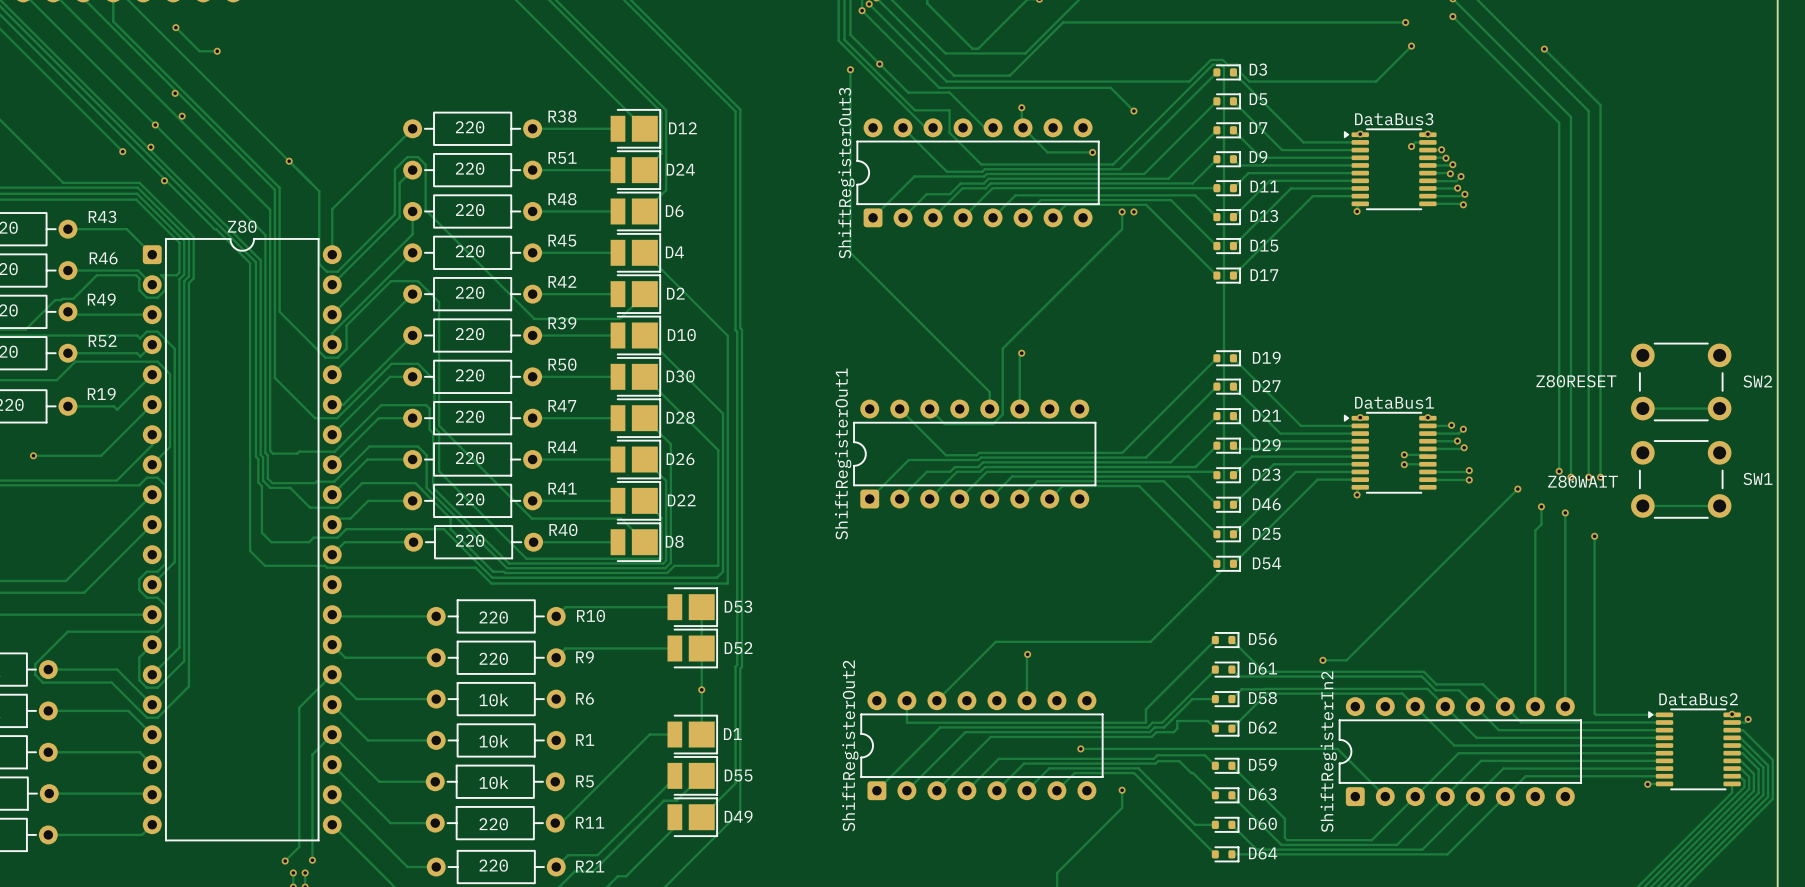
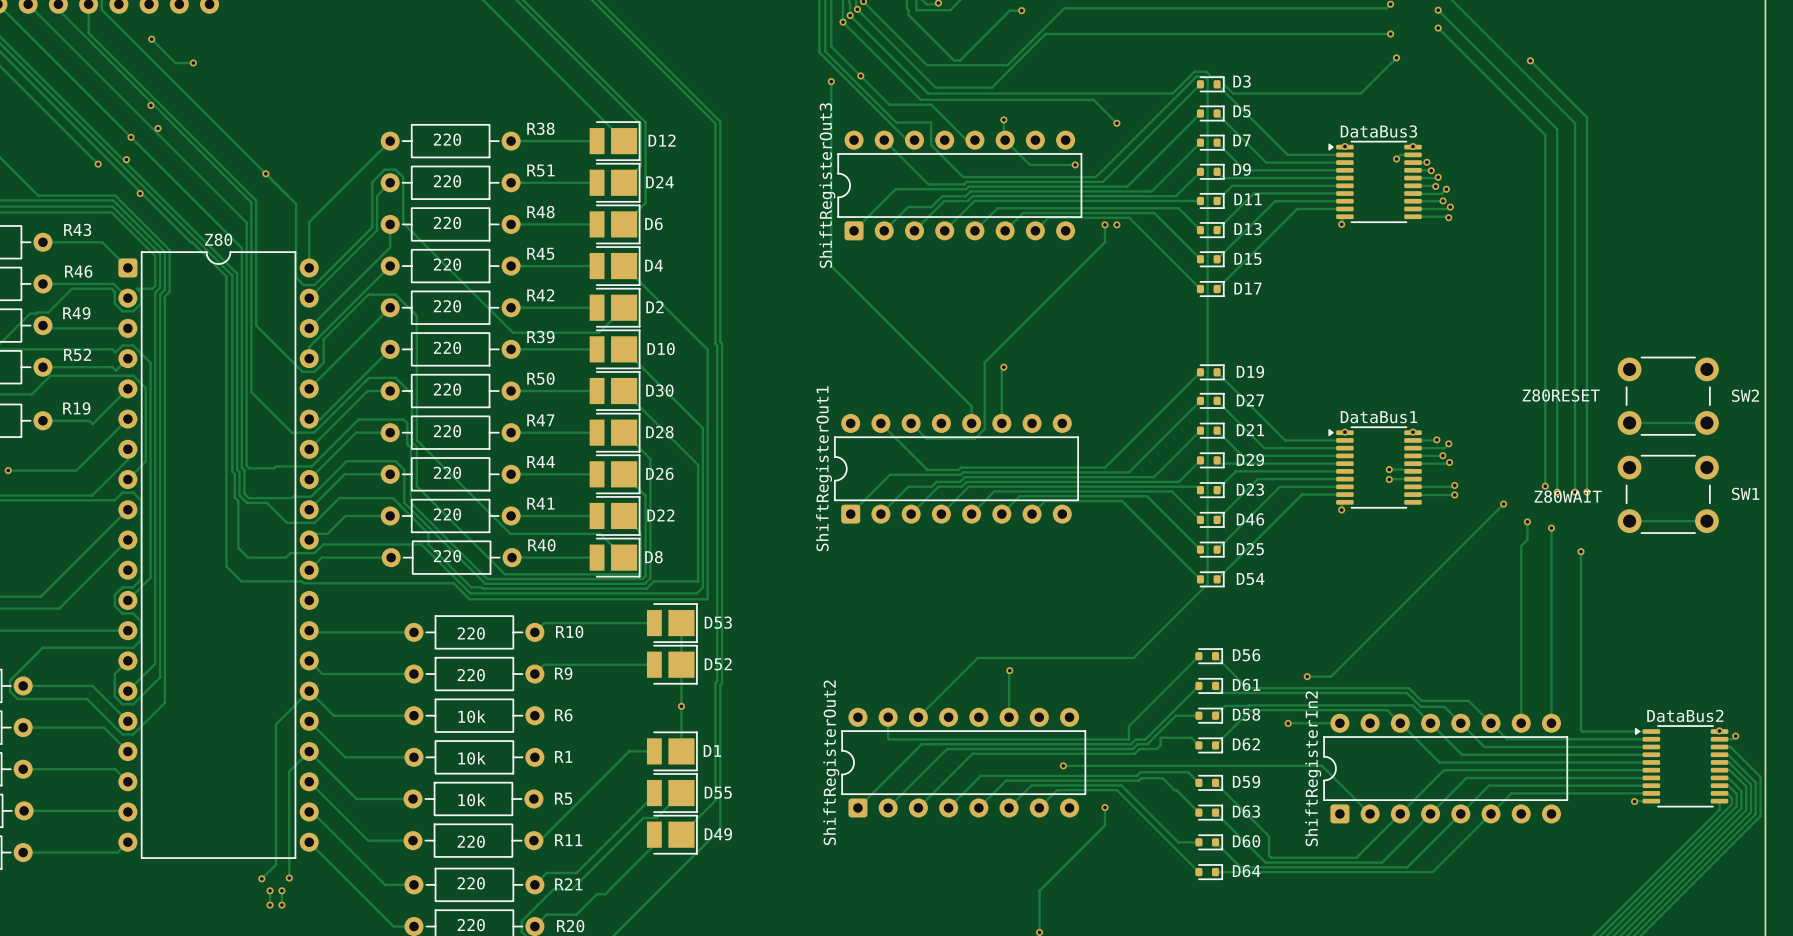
via: none -> (1288, 723)
track: none -> (1339, 723) (1288, 723)

